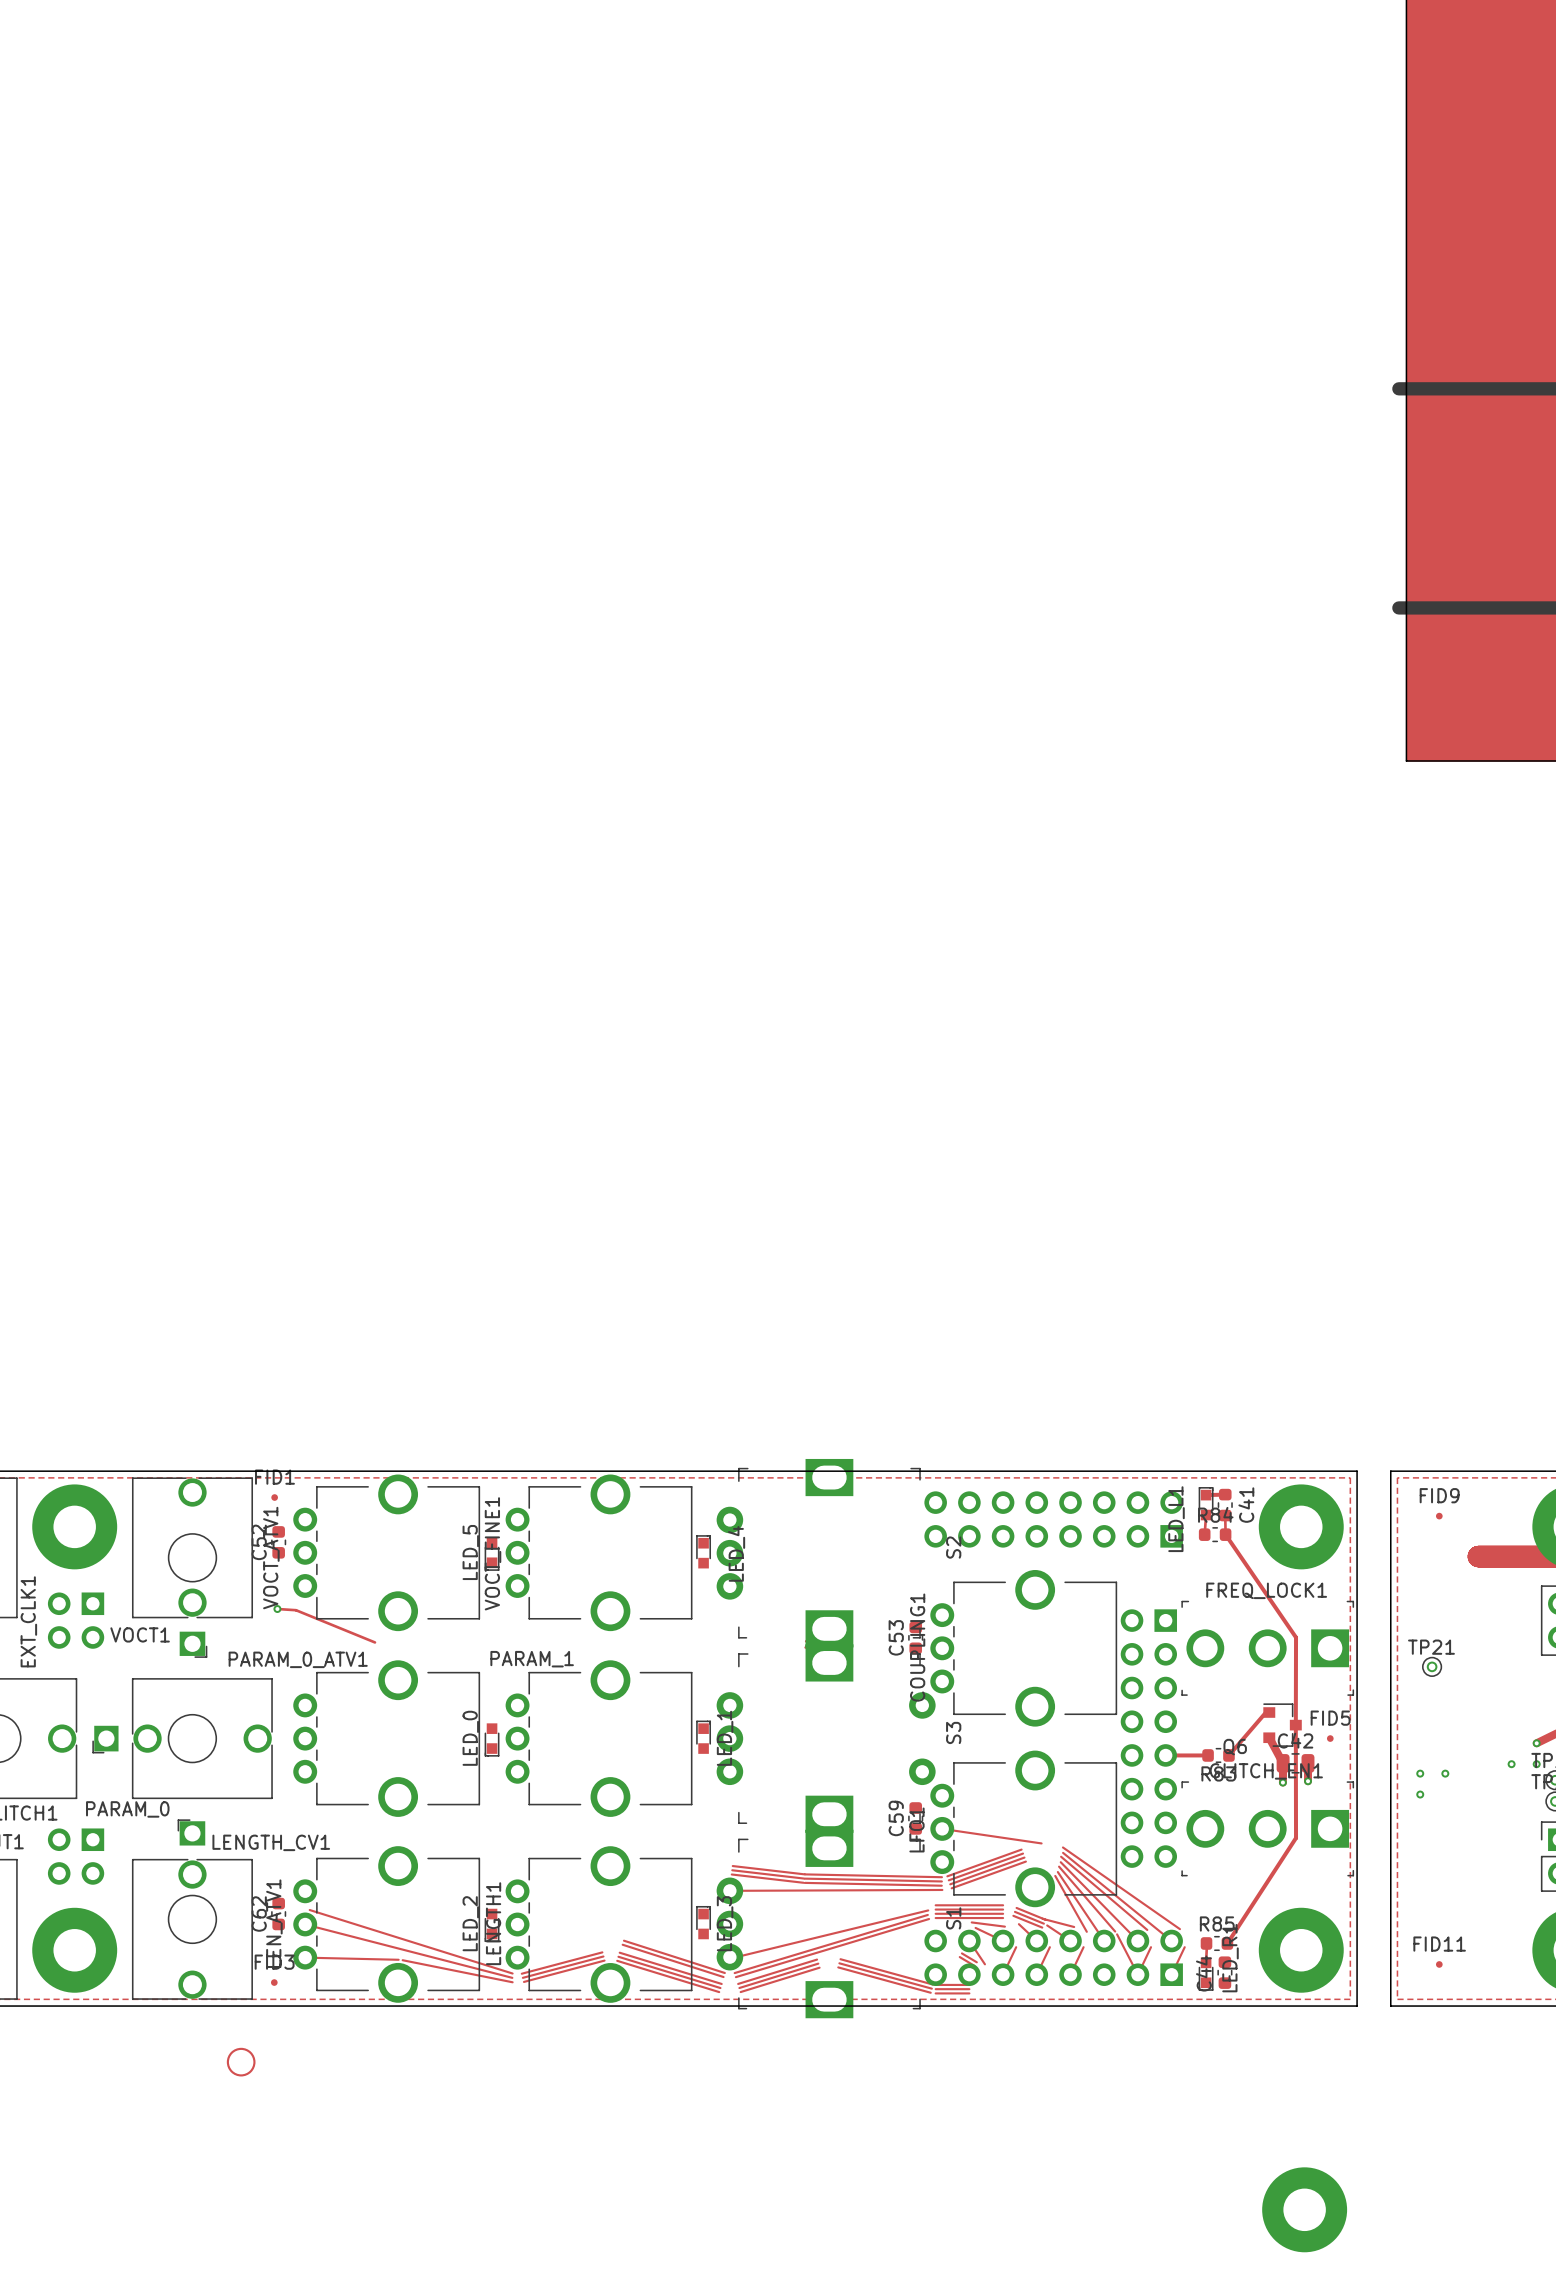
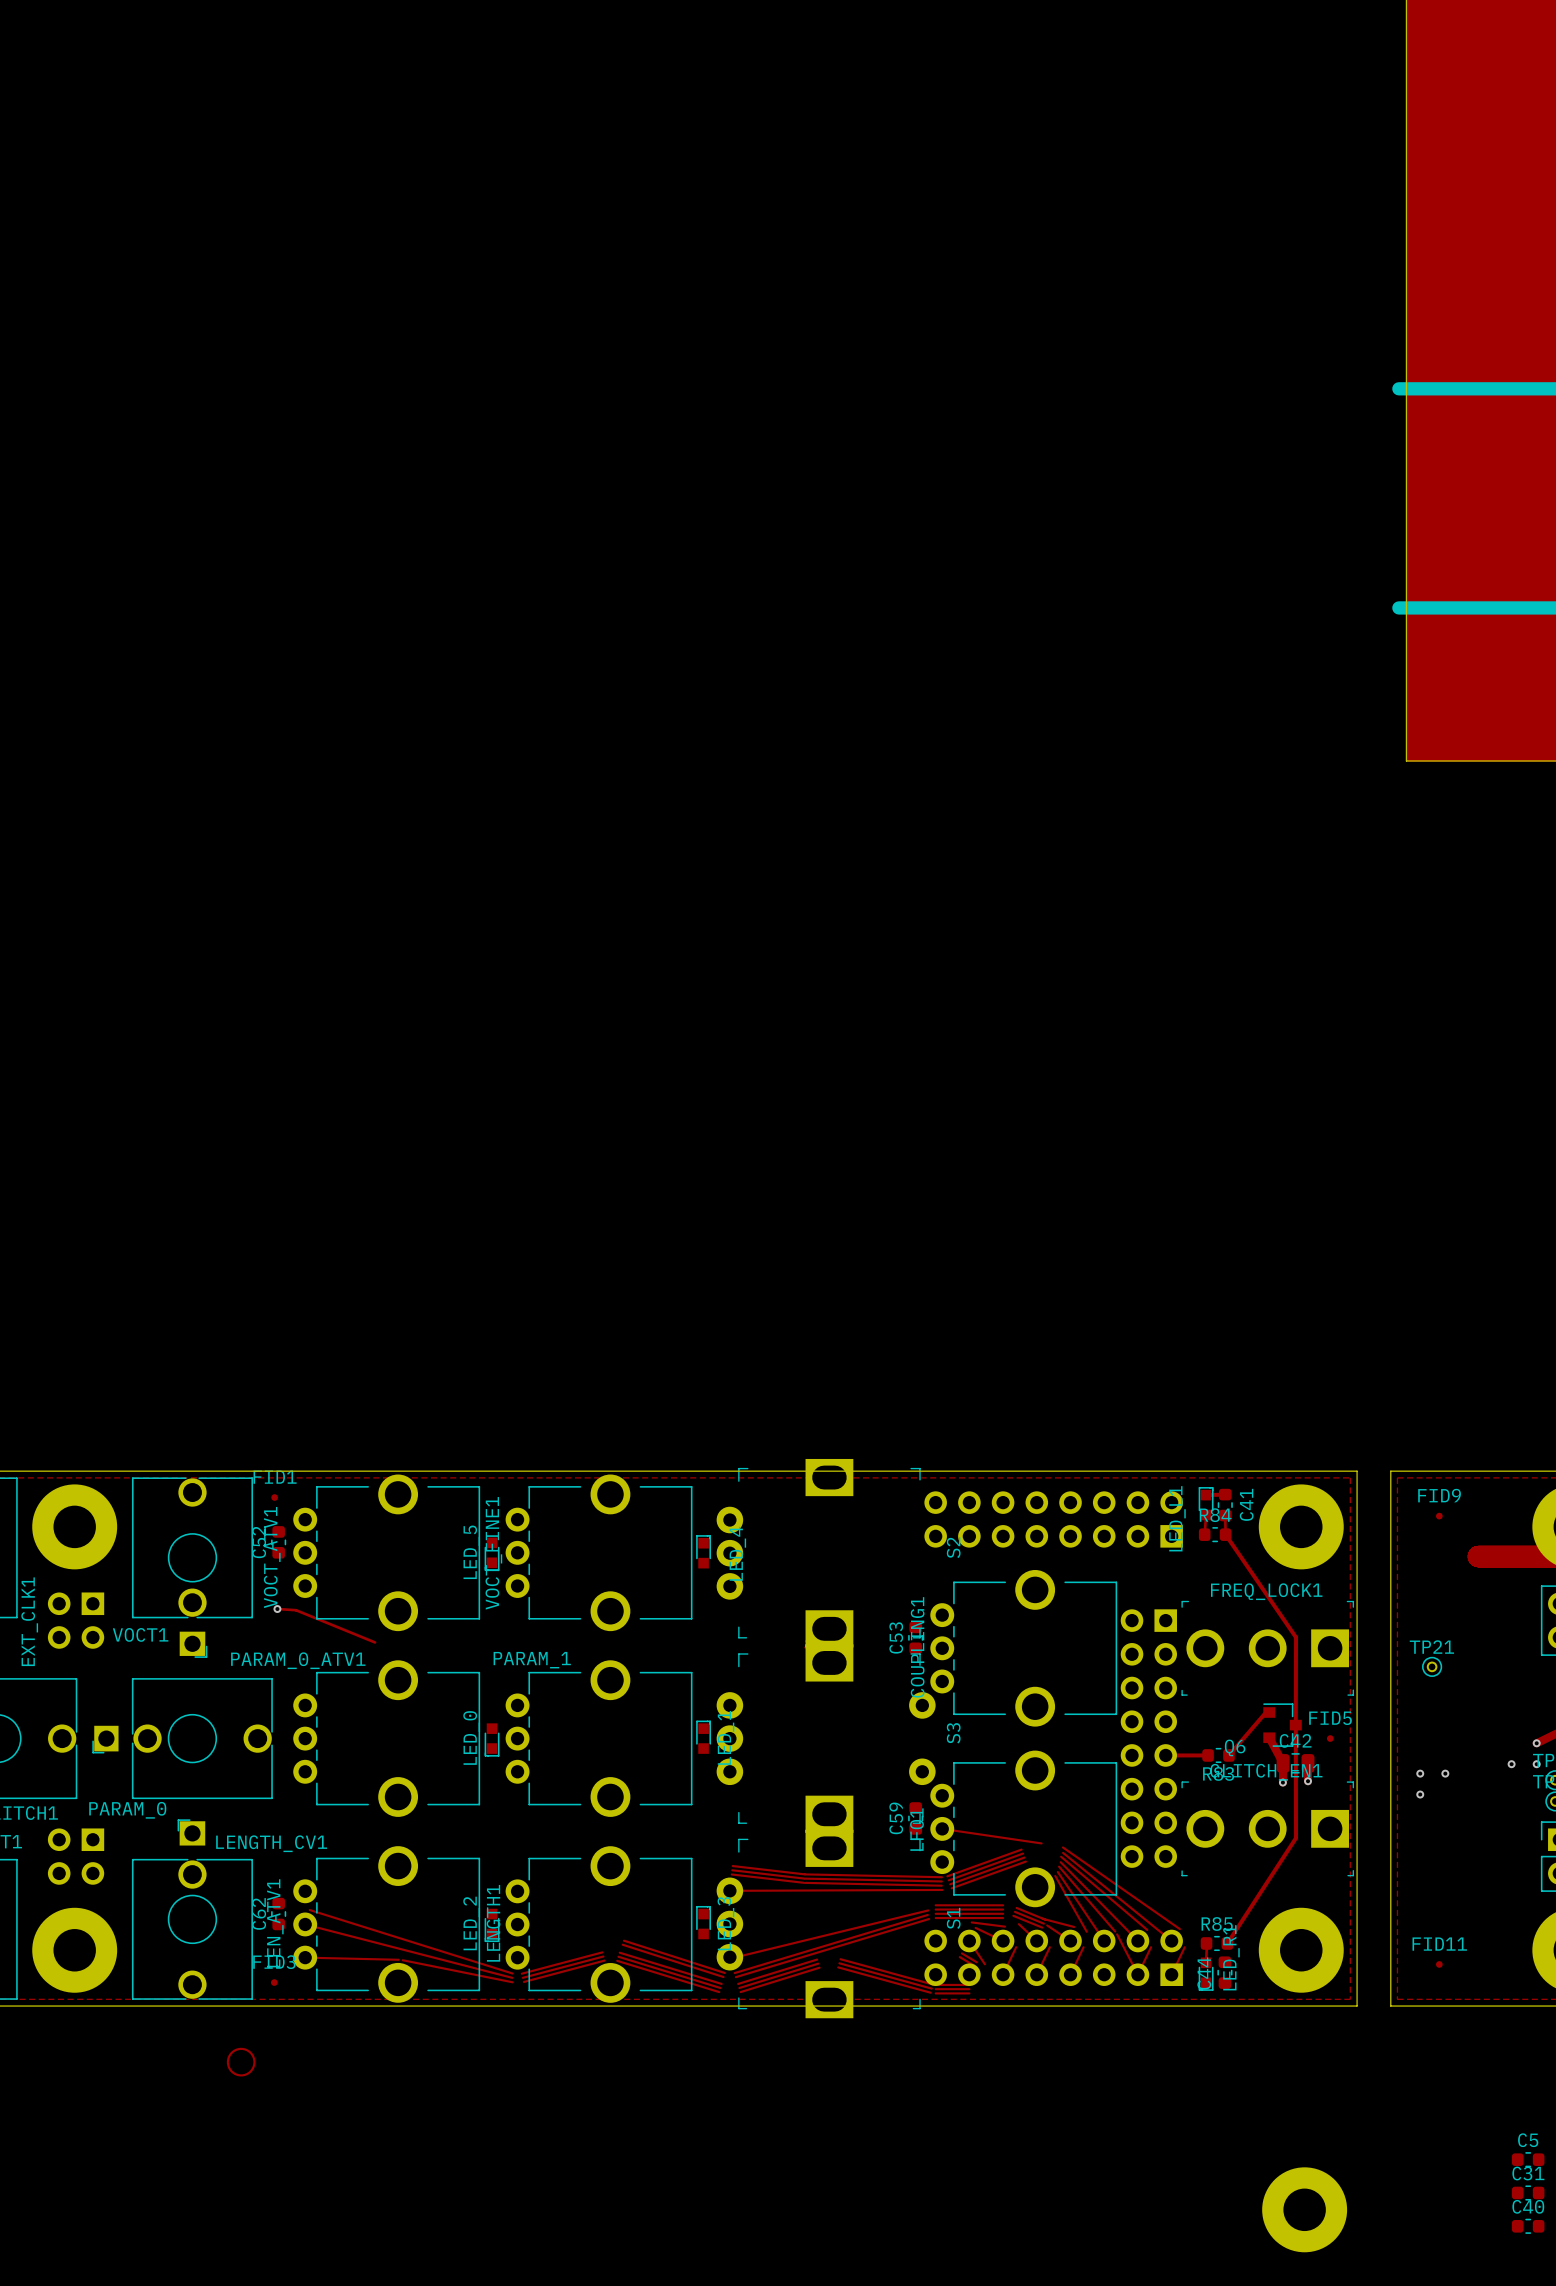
C5: none -> (1528, 2159)
C31: none -> (1528, 2192)
C40: none -> (1528, 2226)

